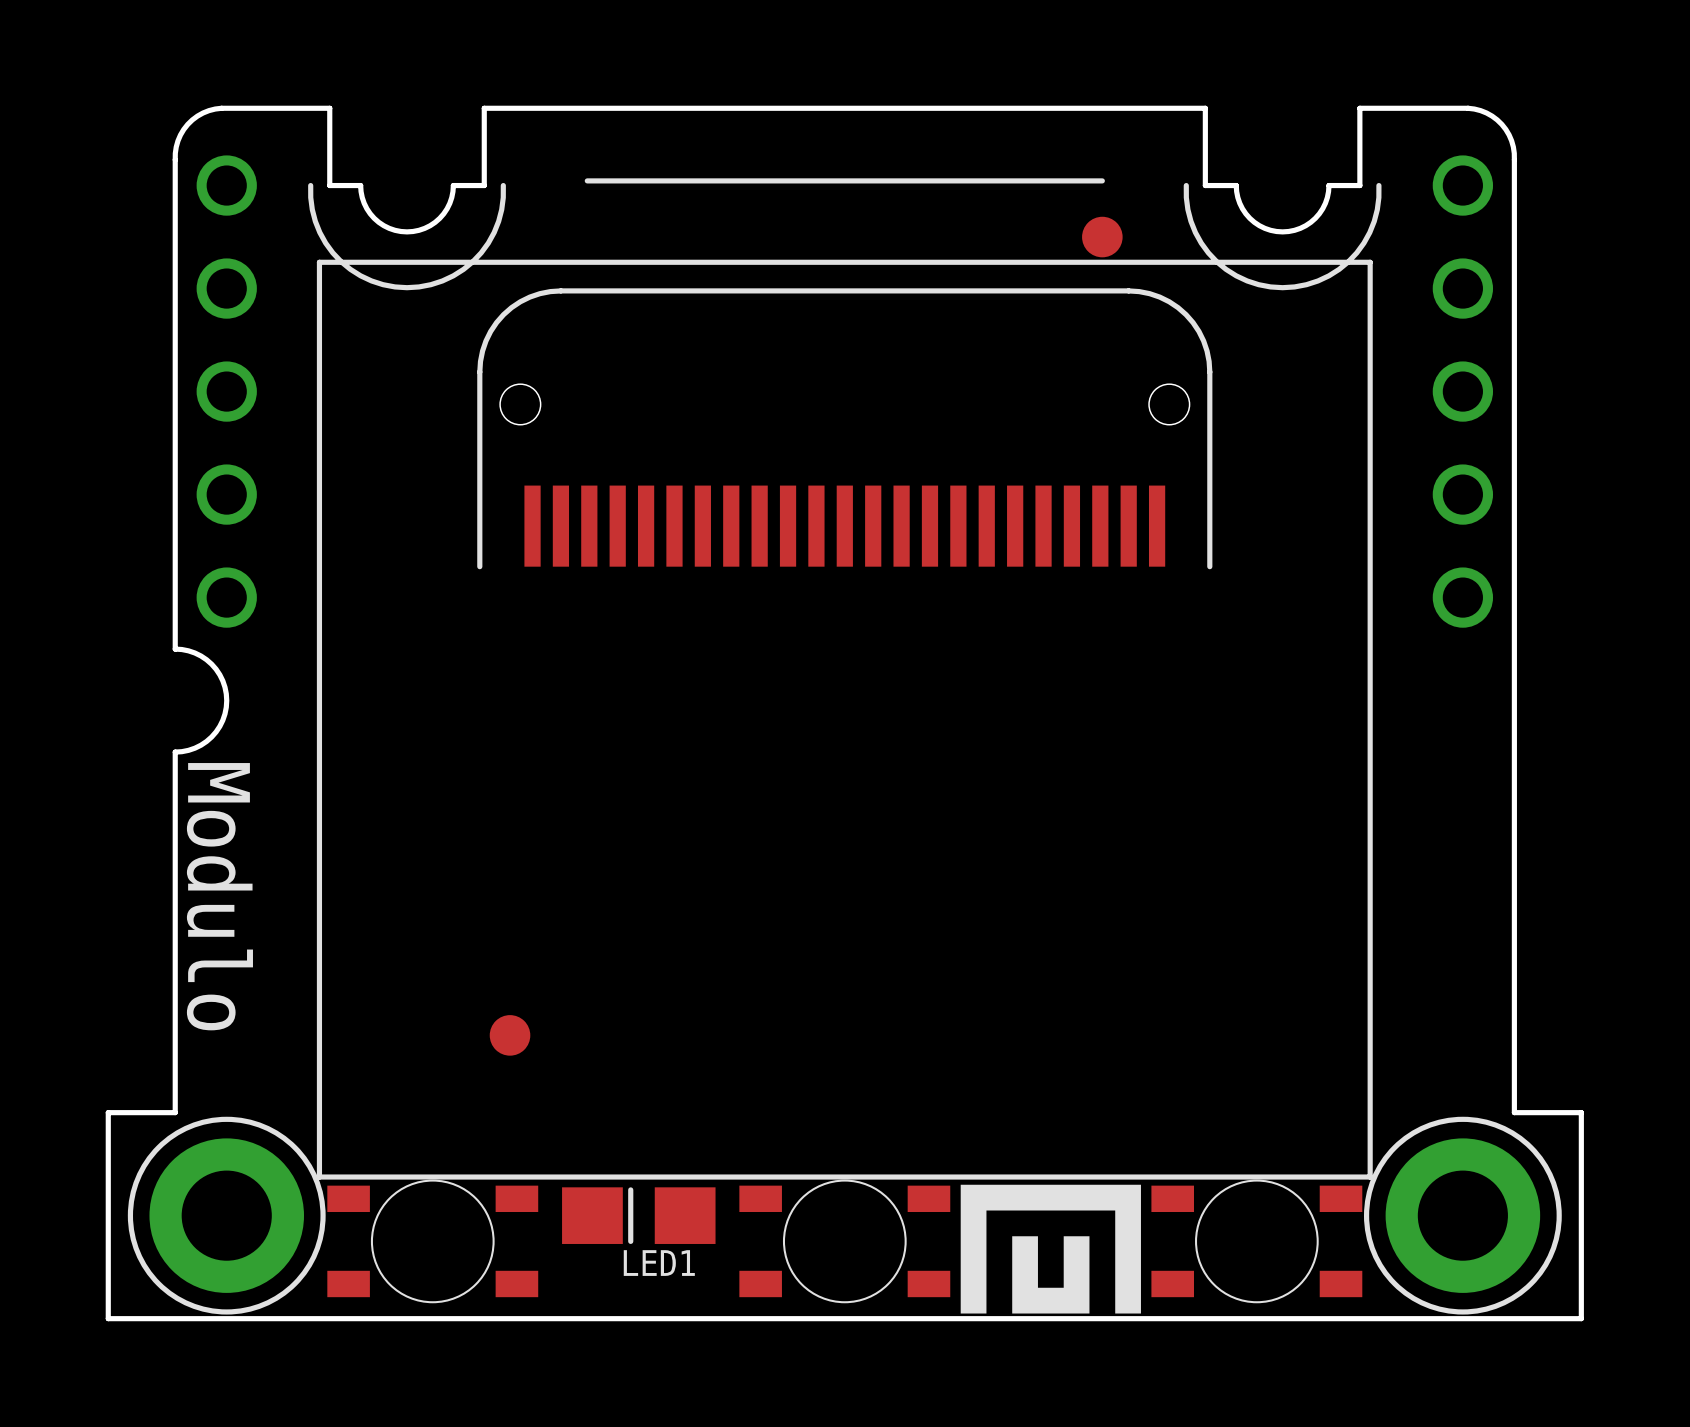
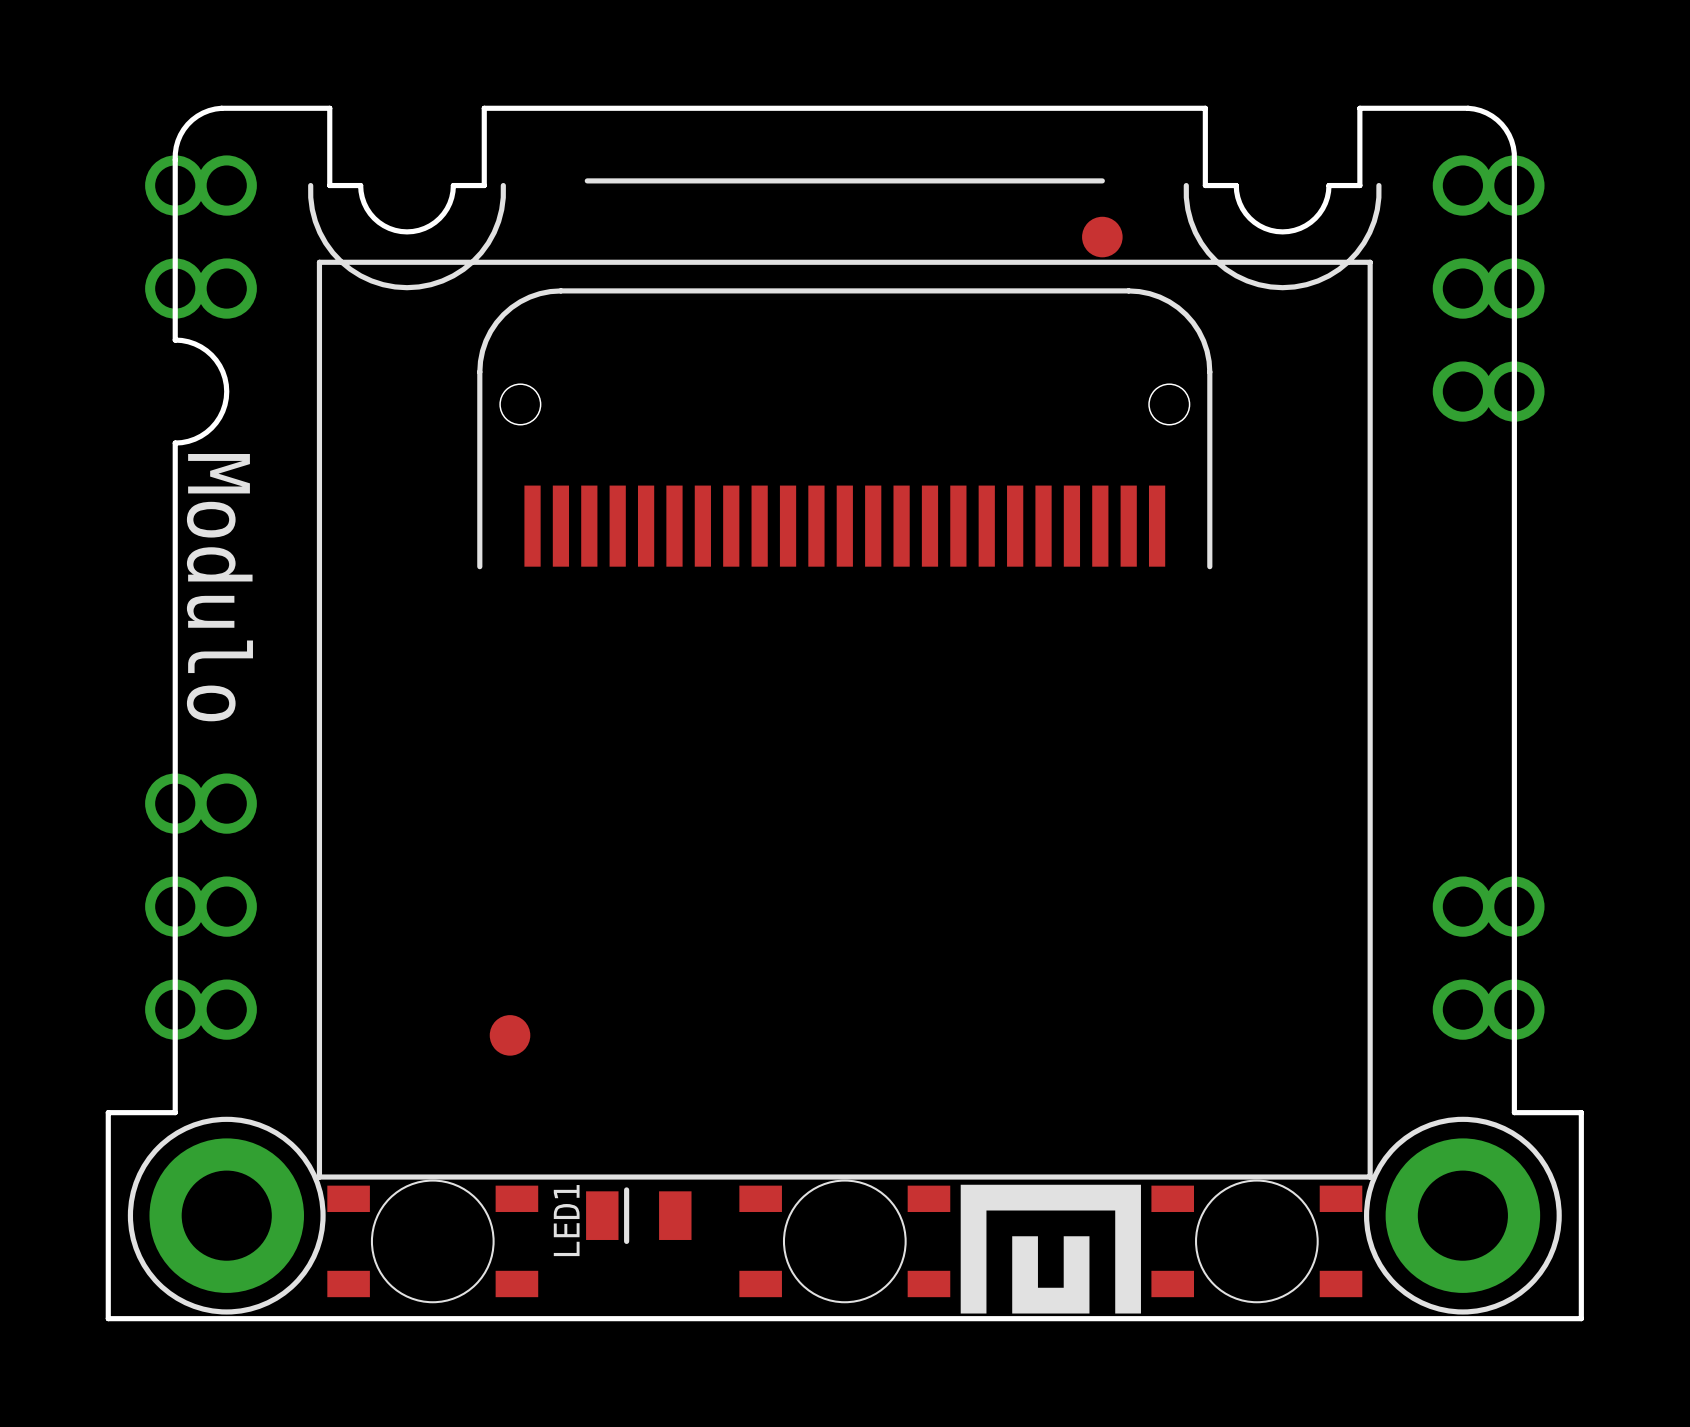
part footprint: [105, 105, 1584, 1322] -> [105, 105, 1584, 1322]
LED1 footprint: [562, 1187, 716, 1244] -> [586, 1187, 692, 1244]
LED1 name rotation: 0° (659, 1263) -> 90° counterclockwise (566, 1220)

